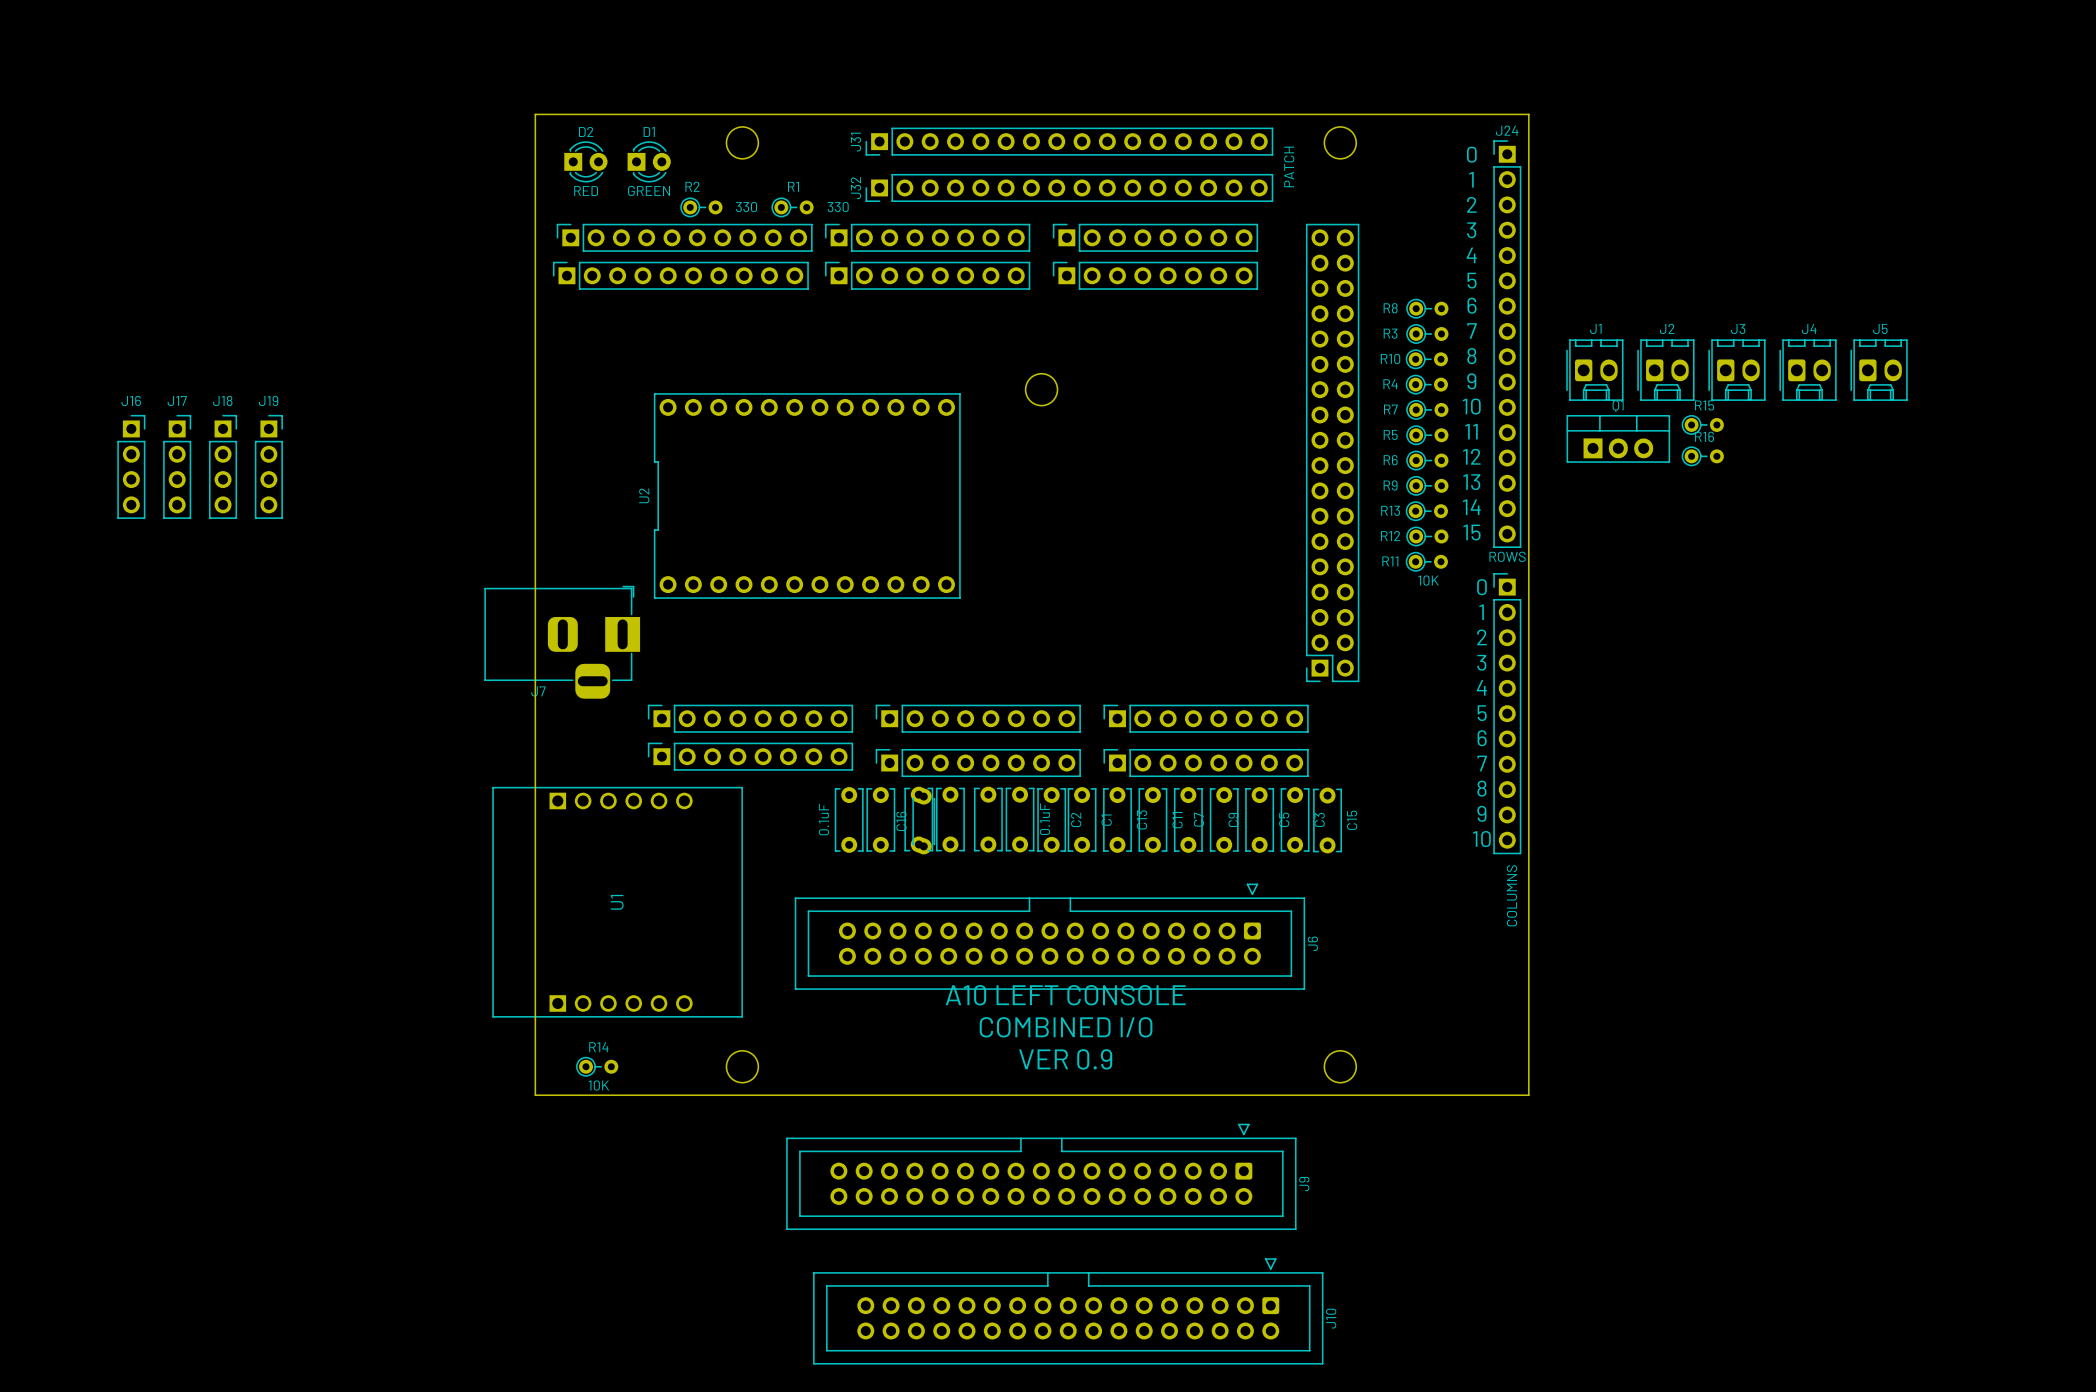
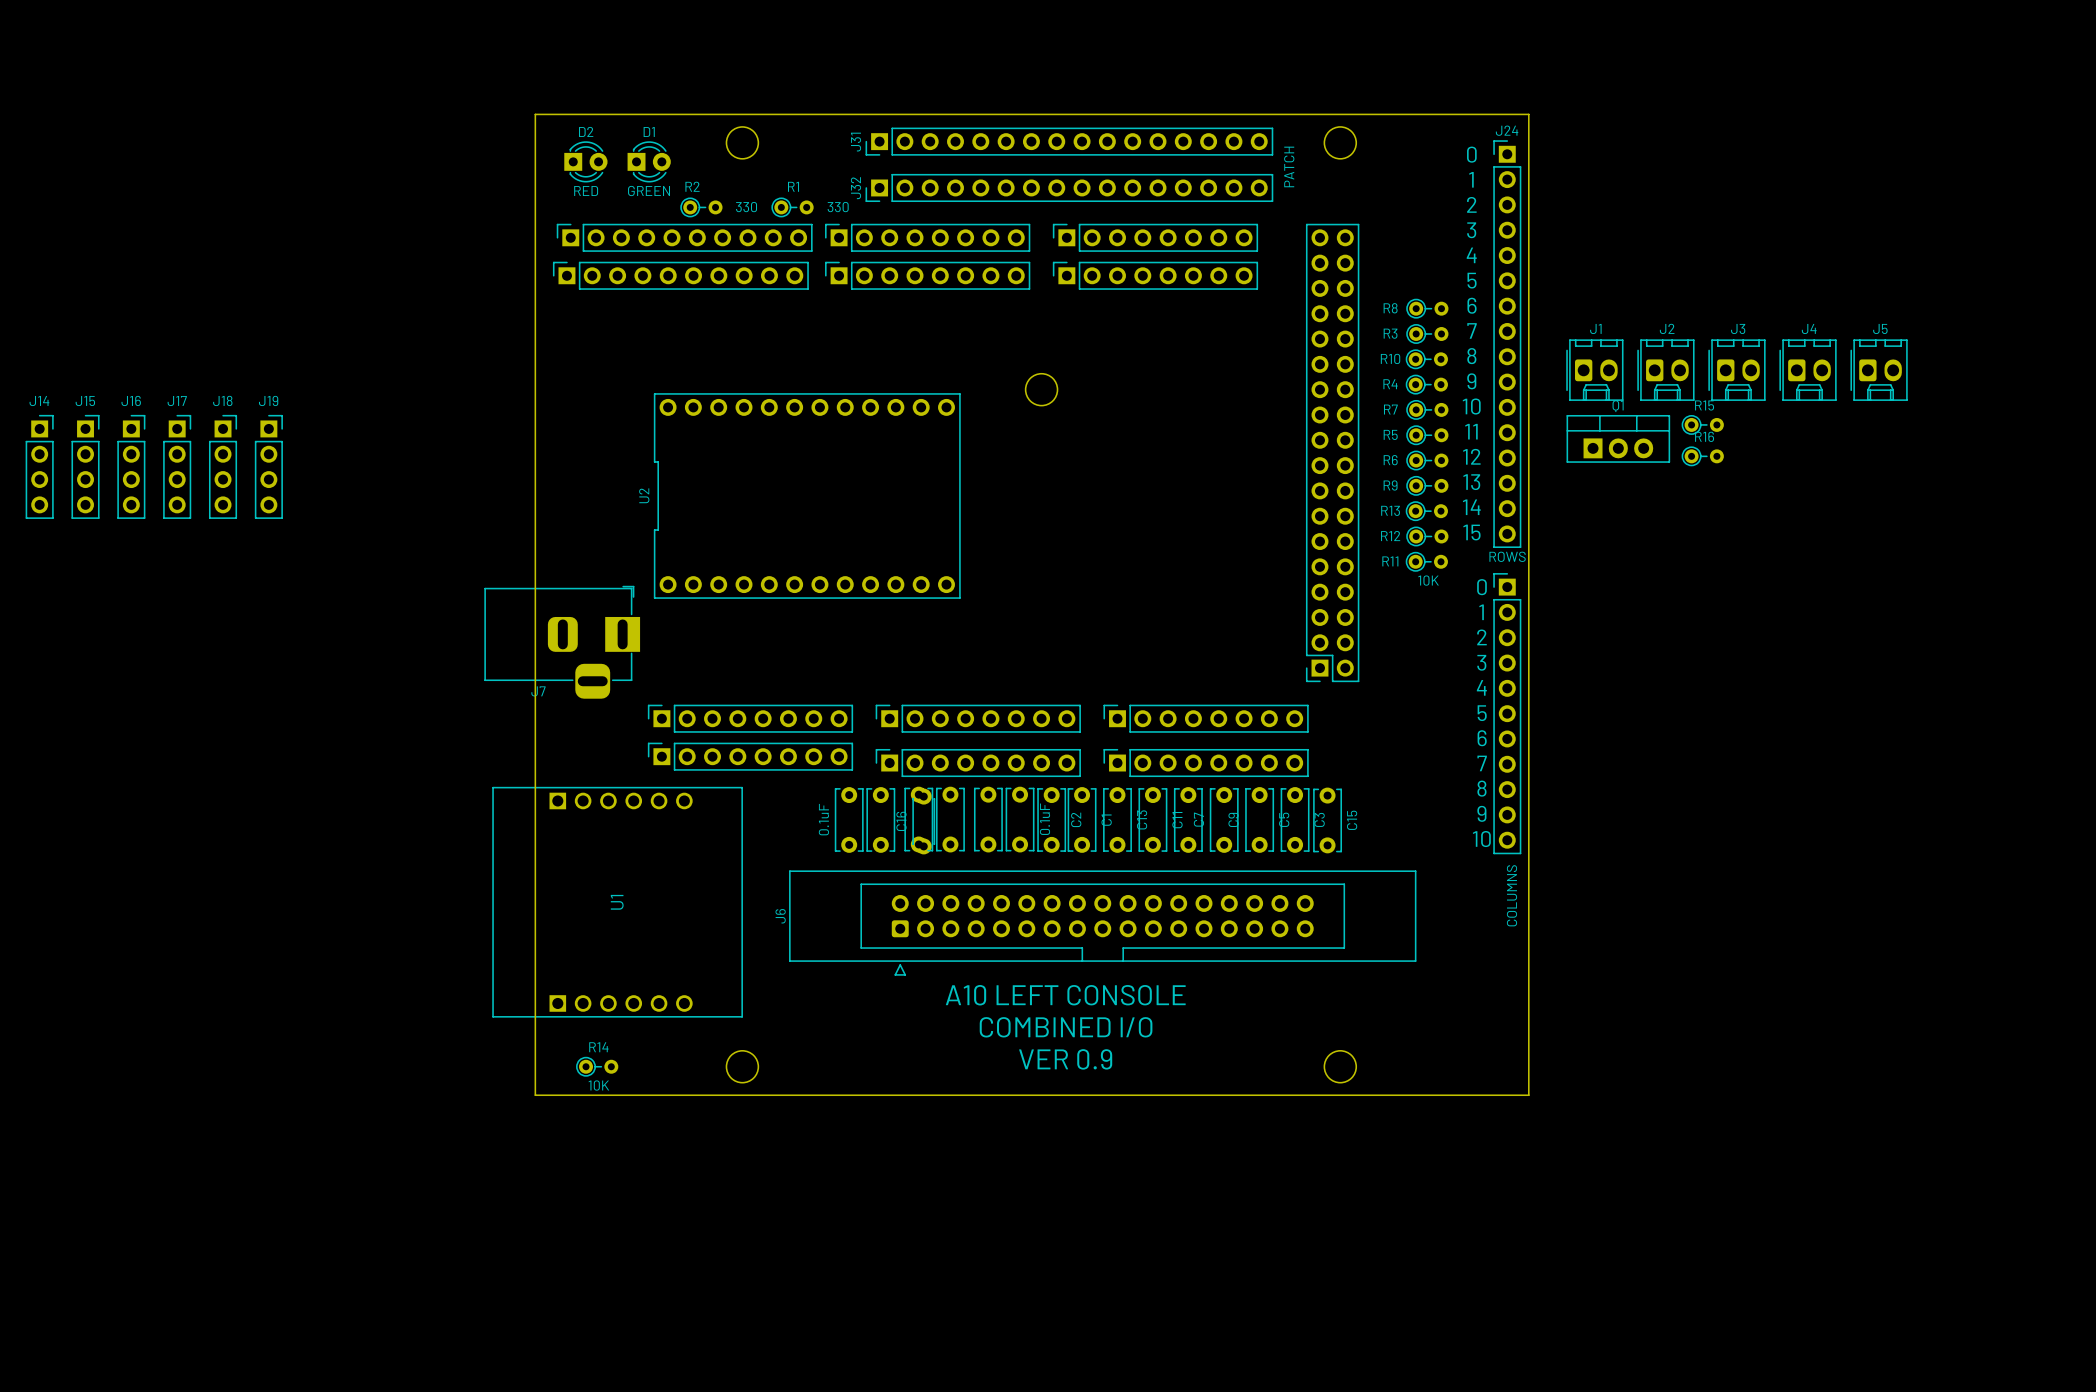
J14: none -> (39, 466)
J15: none -> (85, 466)
J6 footprint: [794, 883, 1305, 990] -> [789, 870, 1417, 976]
J6 name position: J6 (1312, 943) -> J6 (780, 916)
J9: (1041, 1176) -> none
J10: (1068, 1311) -> none

